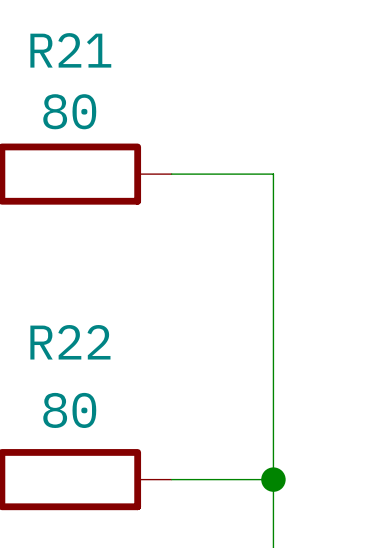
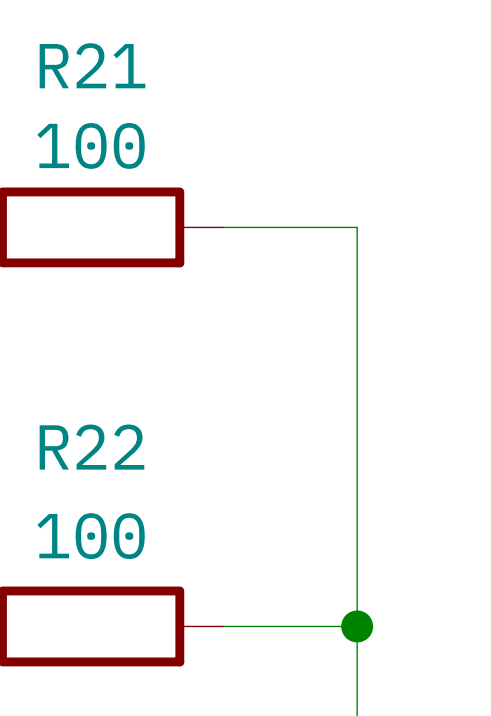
R21 value: 80 (69, 111) -> 100 (91, 145)
R22 value: 80 (69, 410) -> 100 (91, 536)

